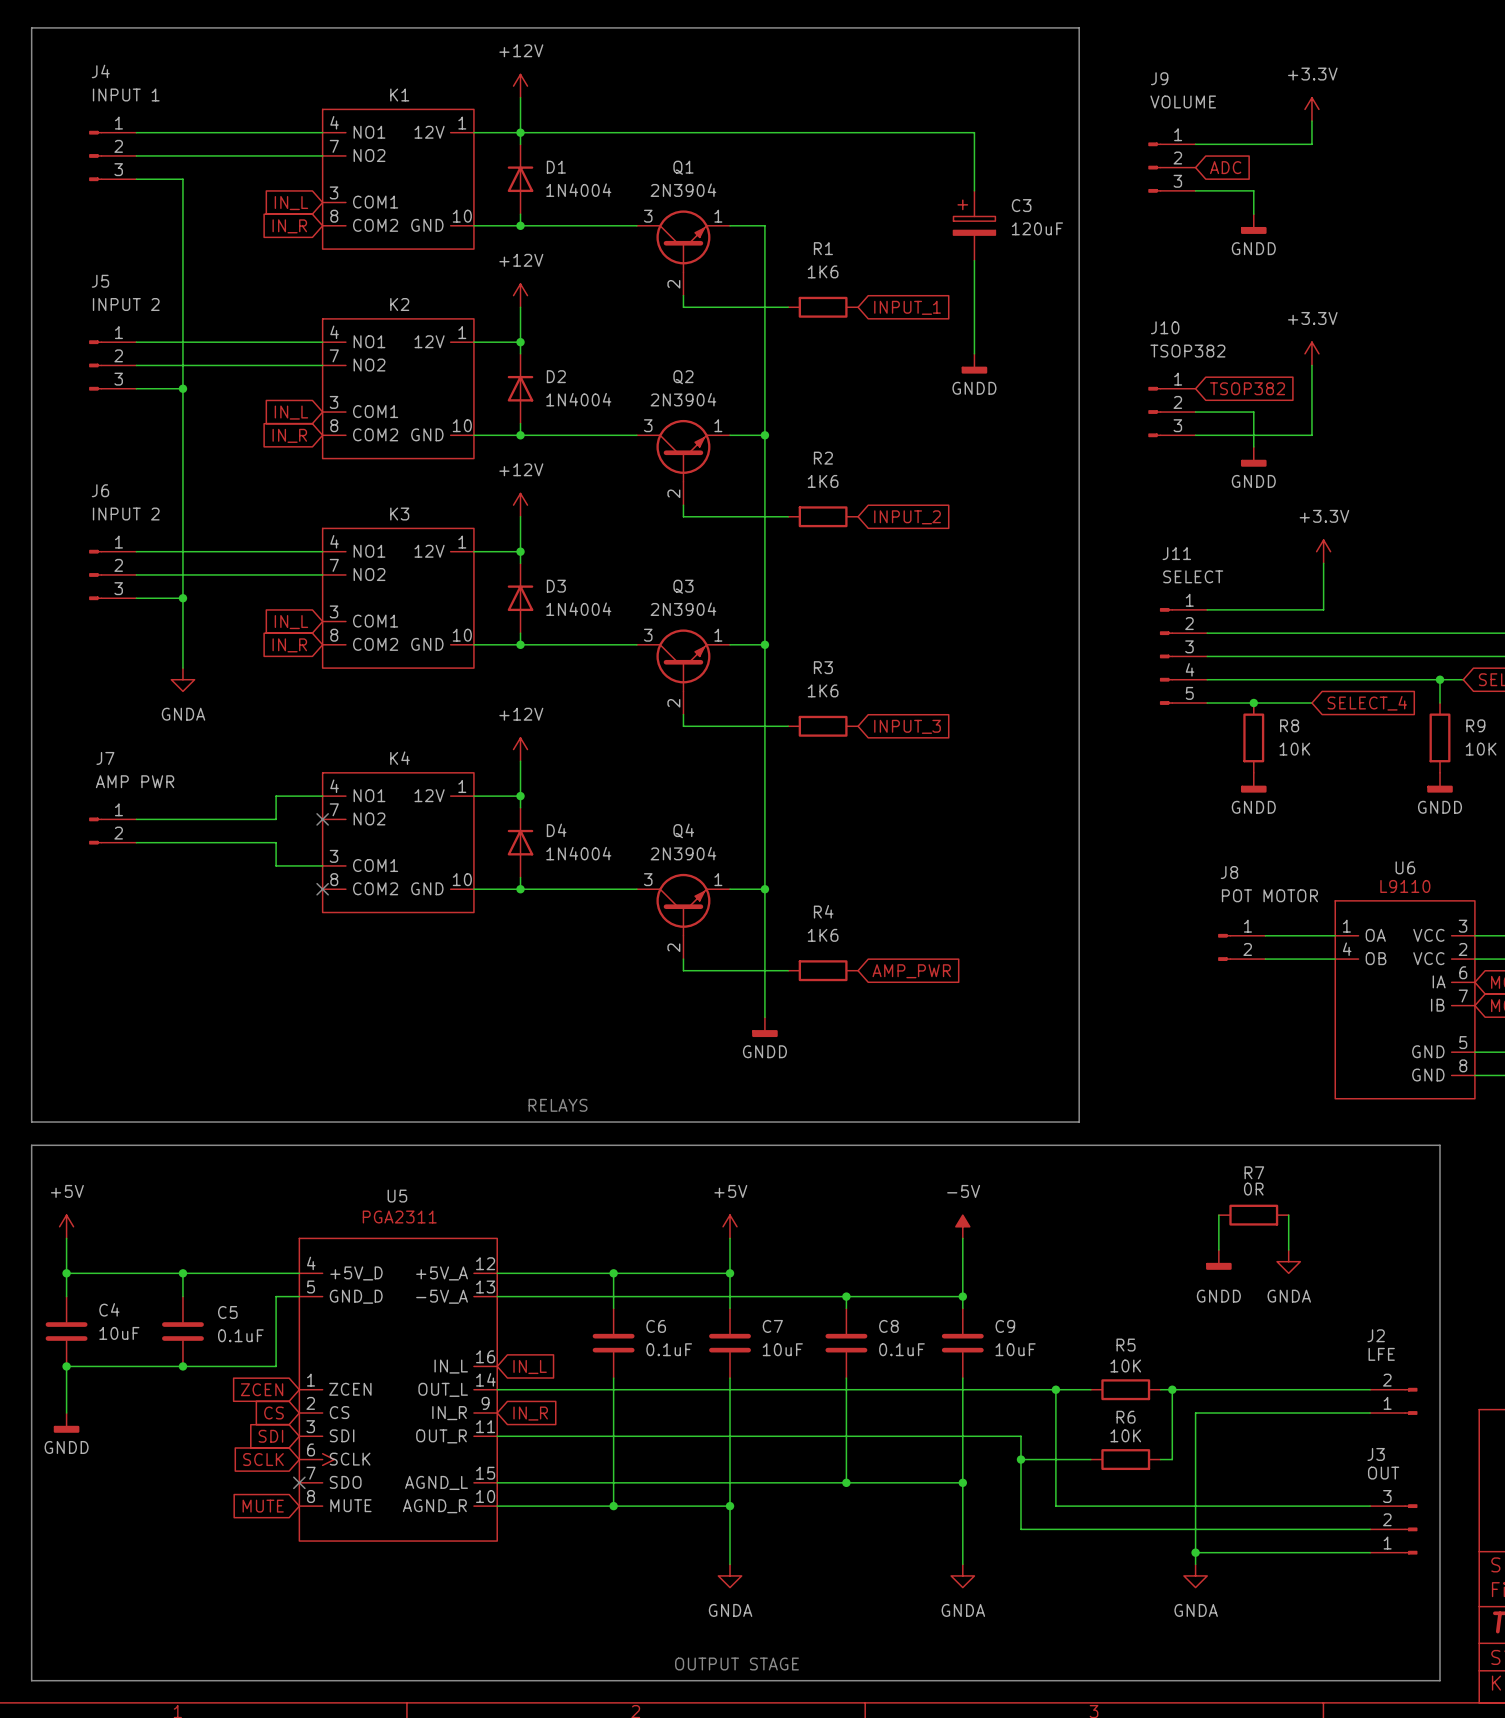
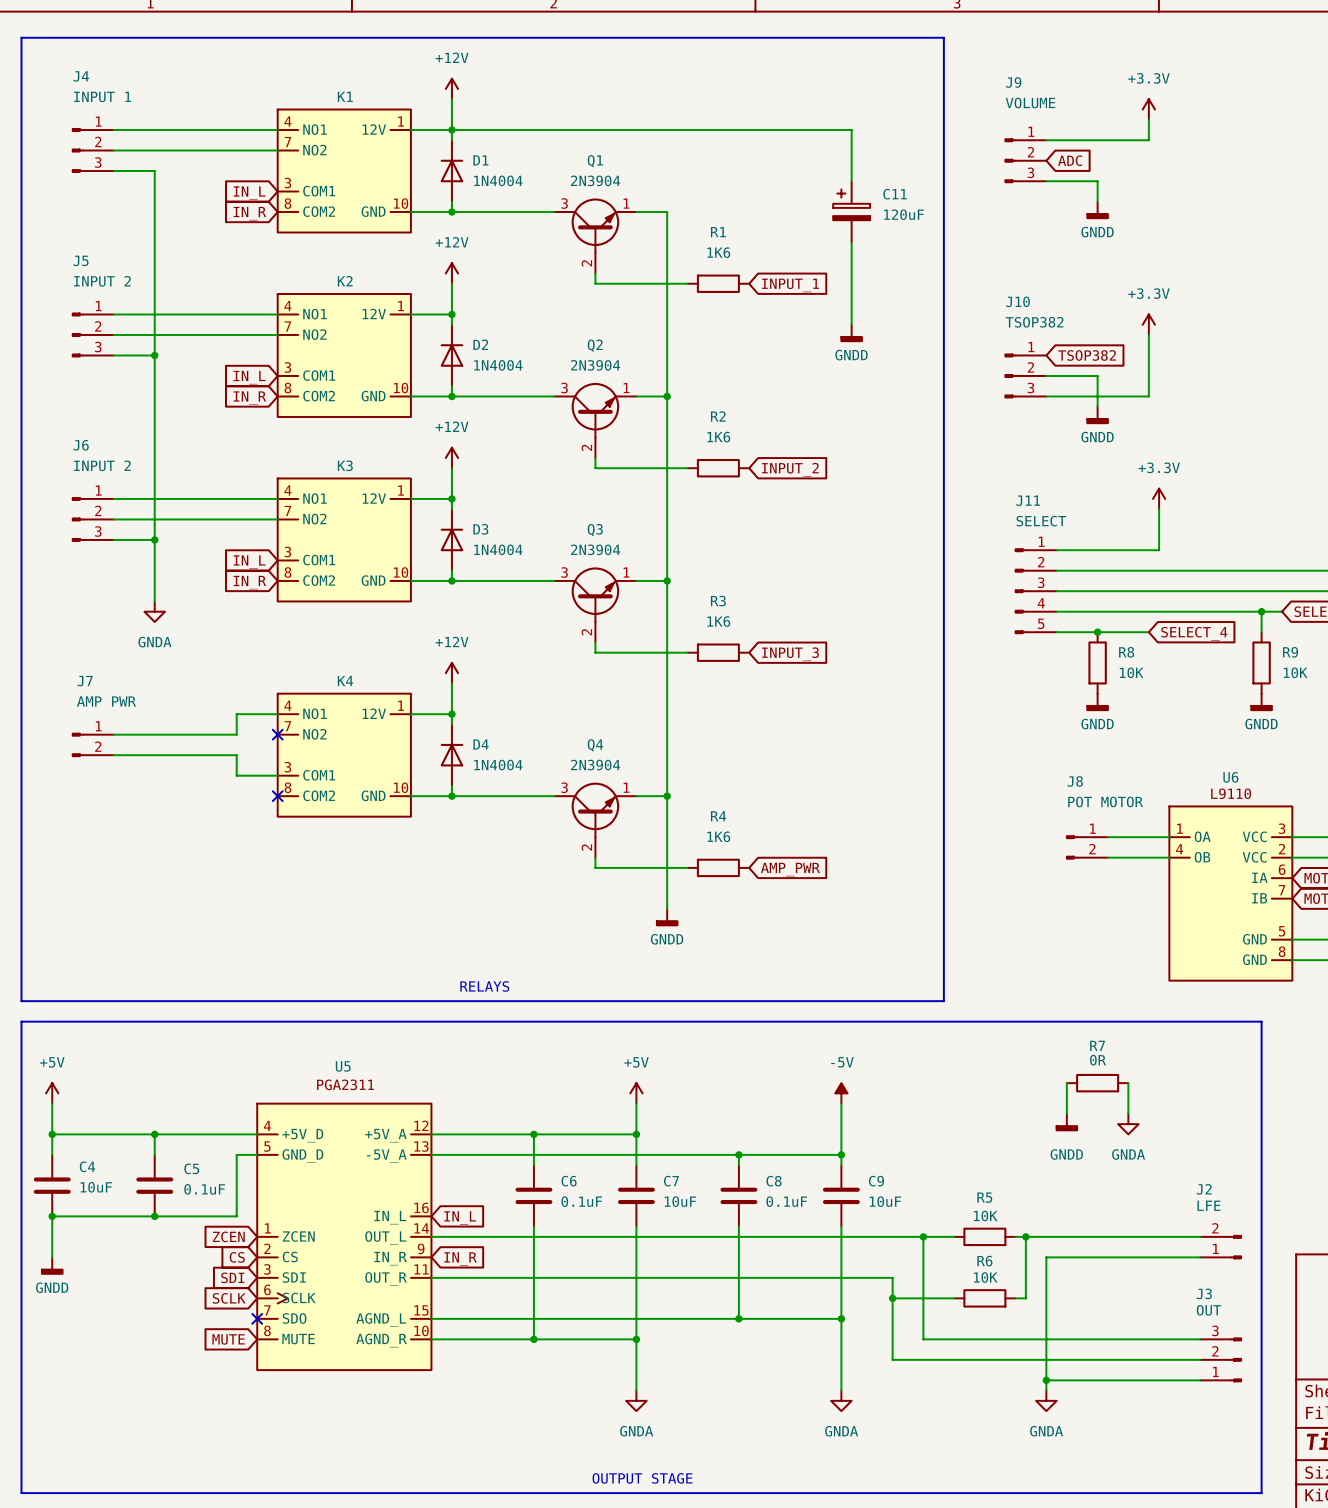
C3 name: C3 (1021, 205) -> C11 (895, 194)

